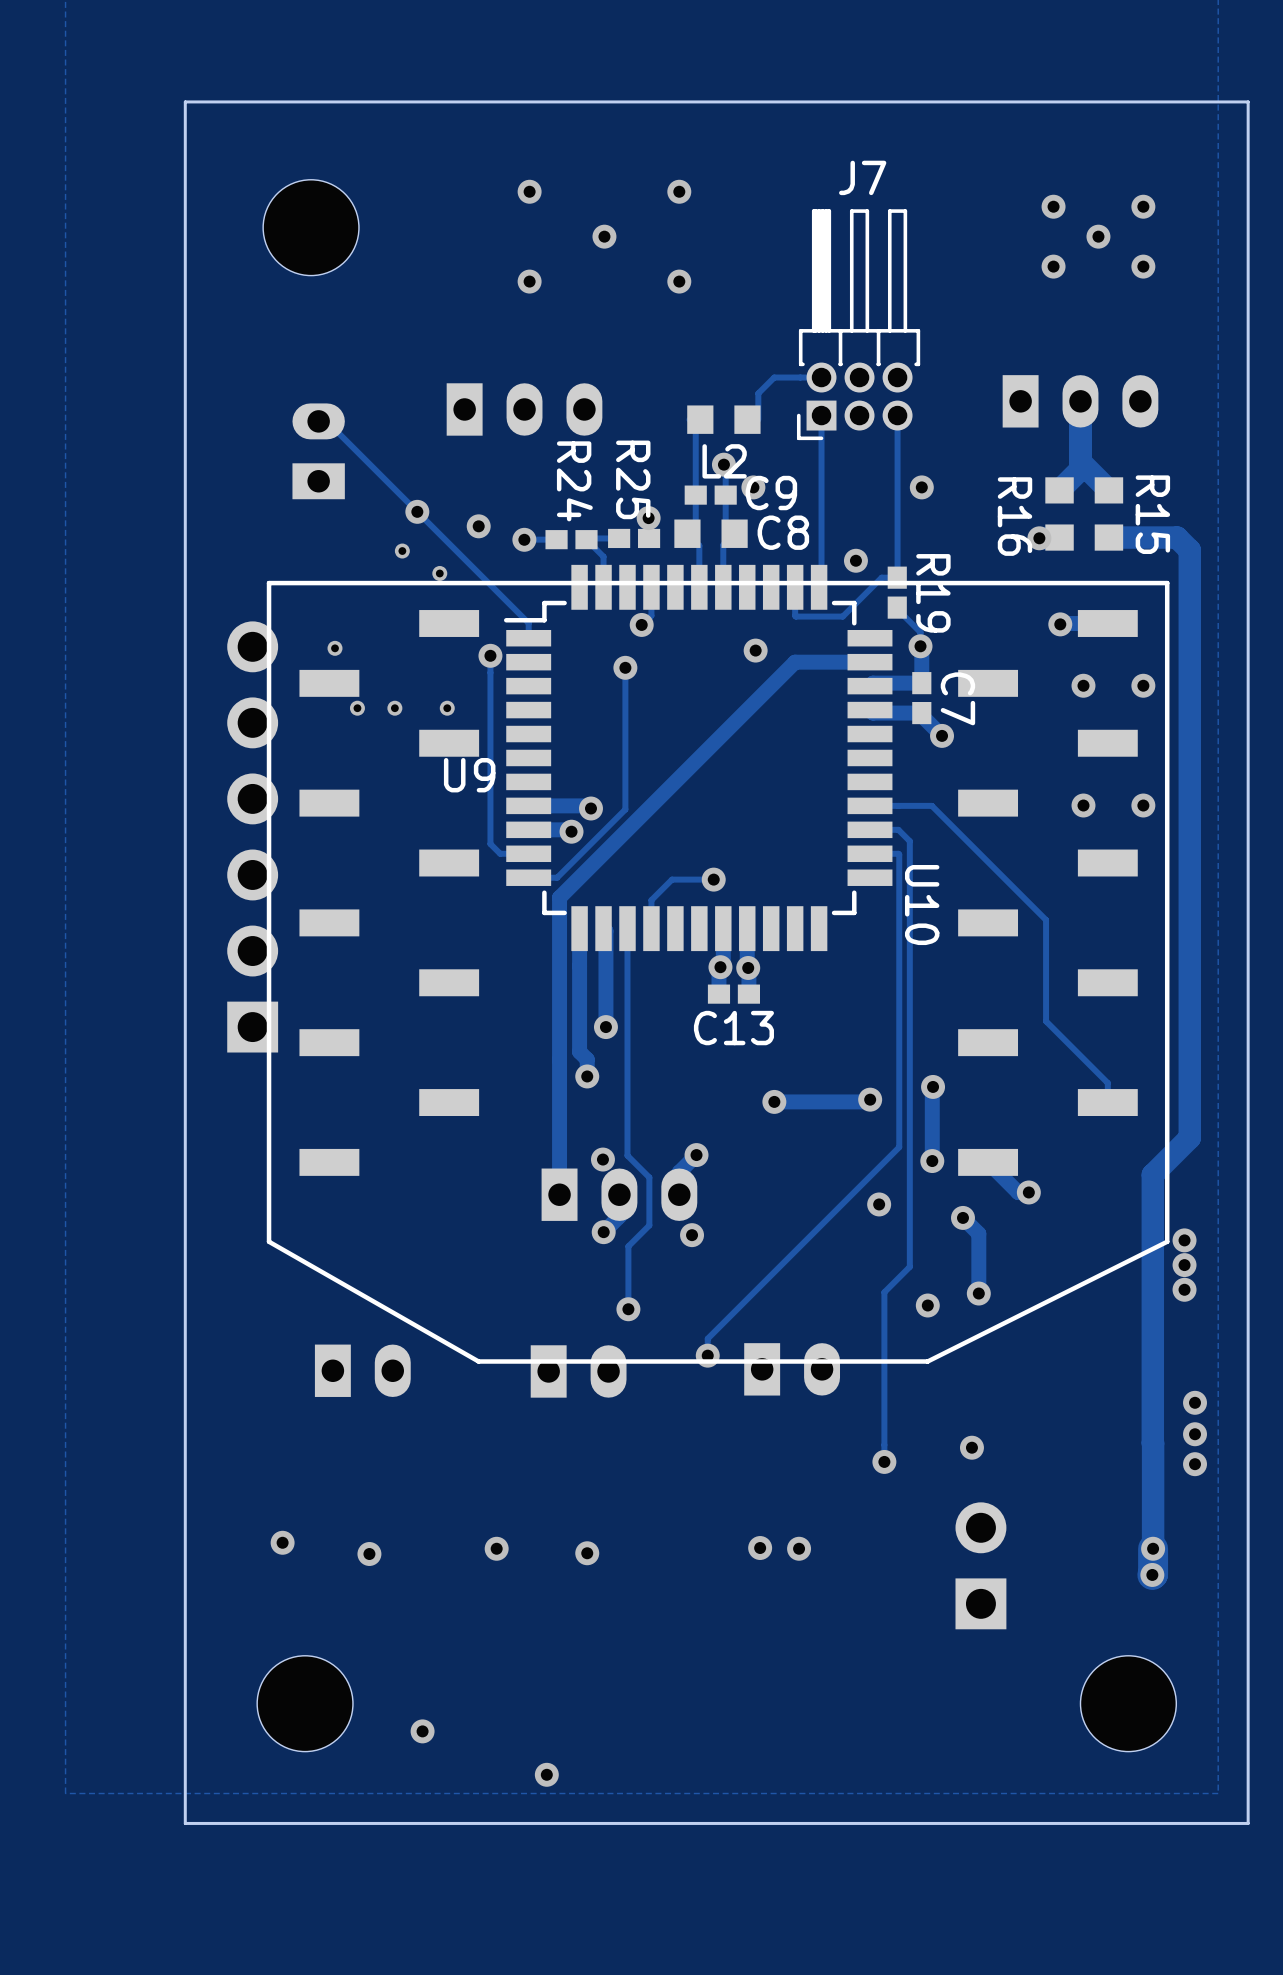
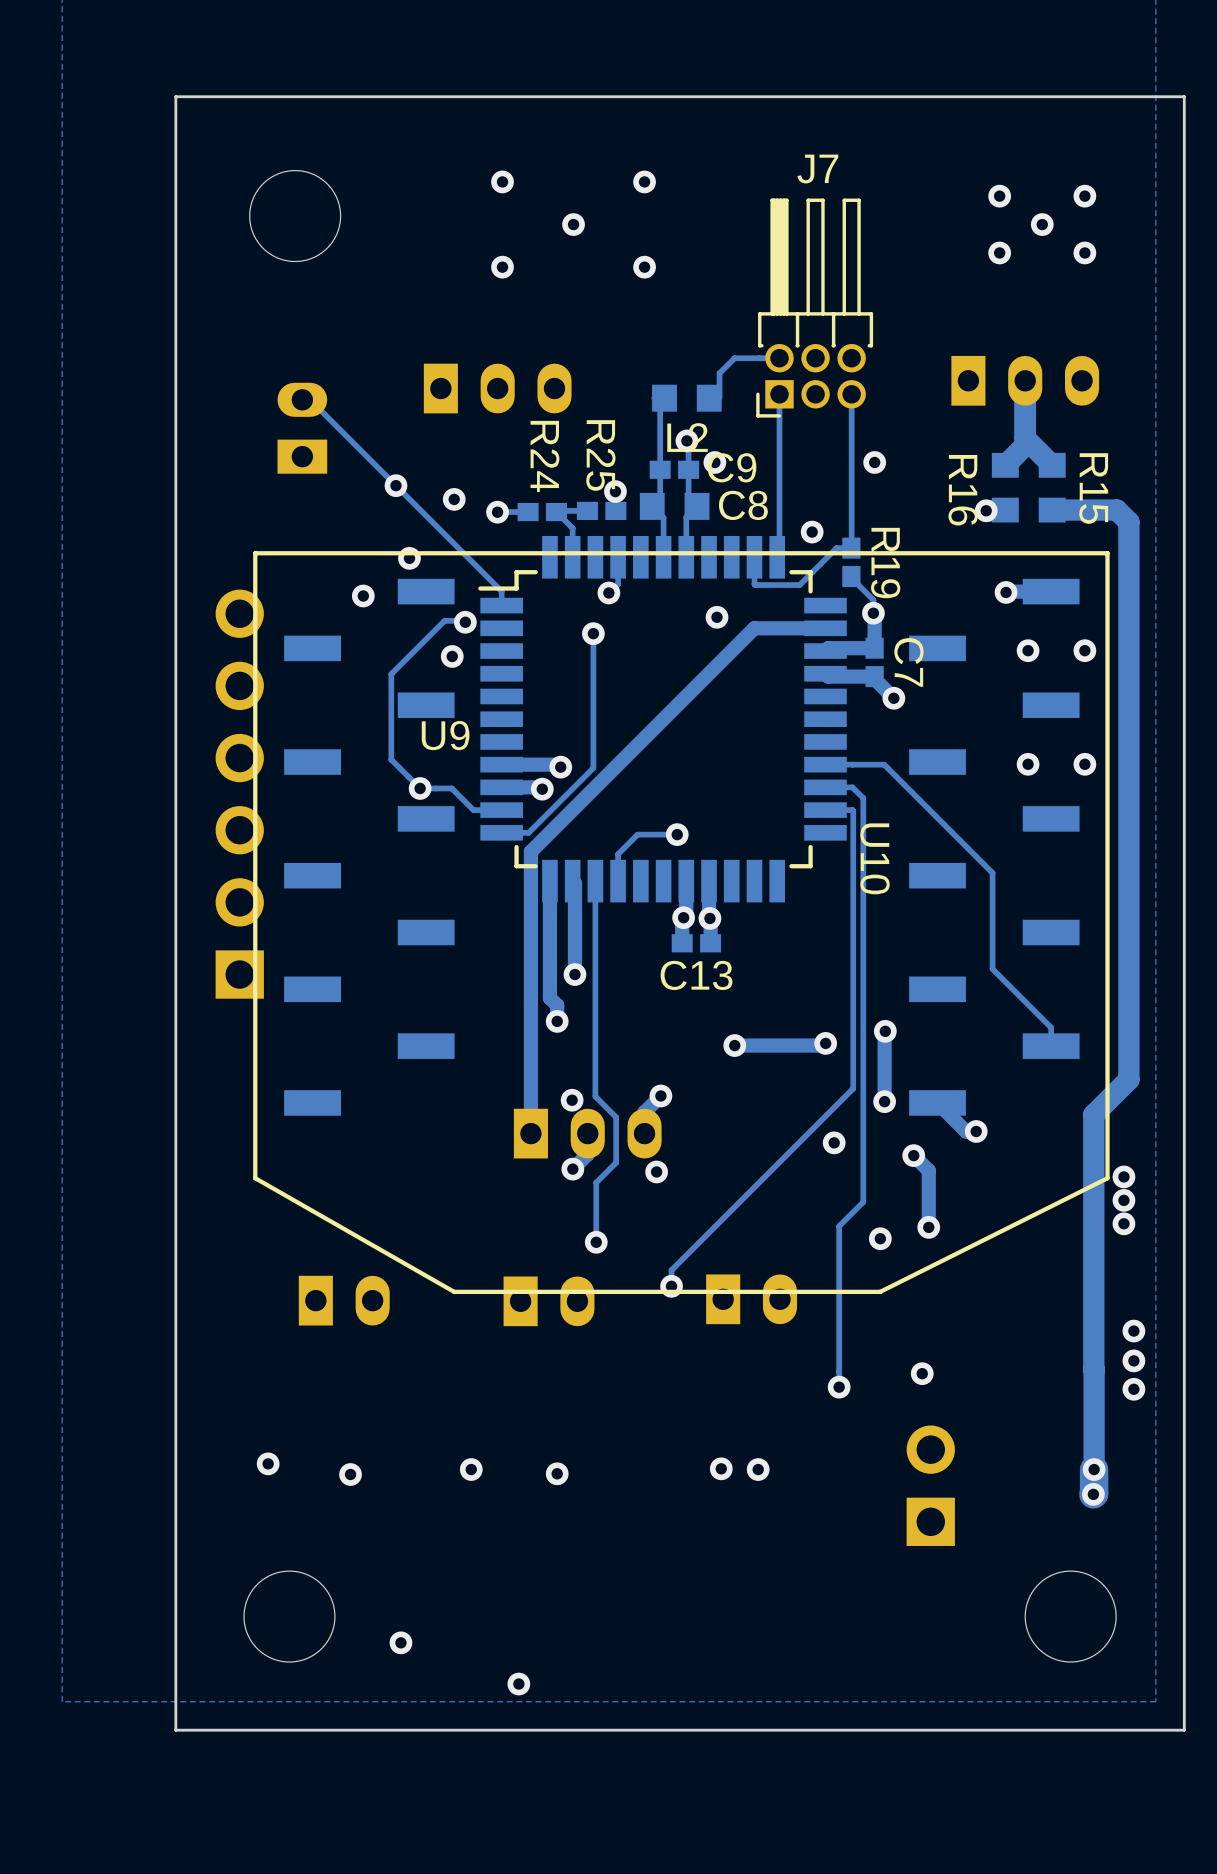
via: (402, 551) -> none
via size: [432, 566, 448, 581] -> [398, 546, 421, 570]
via: none -> (363, 595)
via: (335, 648) -> none
track: (490, 655) (490, 843) (500, 853) -> (460, 620) (444, 620) (391, 674) (391, 759) (420, 788) (451, 788) (474, 810)
via: none -> (452, 656)
via: (357, 708) -> none
via: (394, 708) -> none
via: (447, 708) -> none
via: none -> (420, 788)

